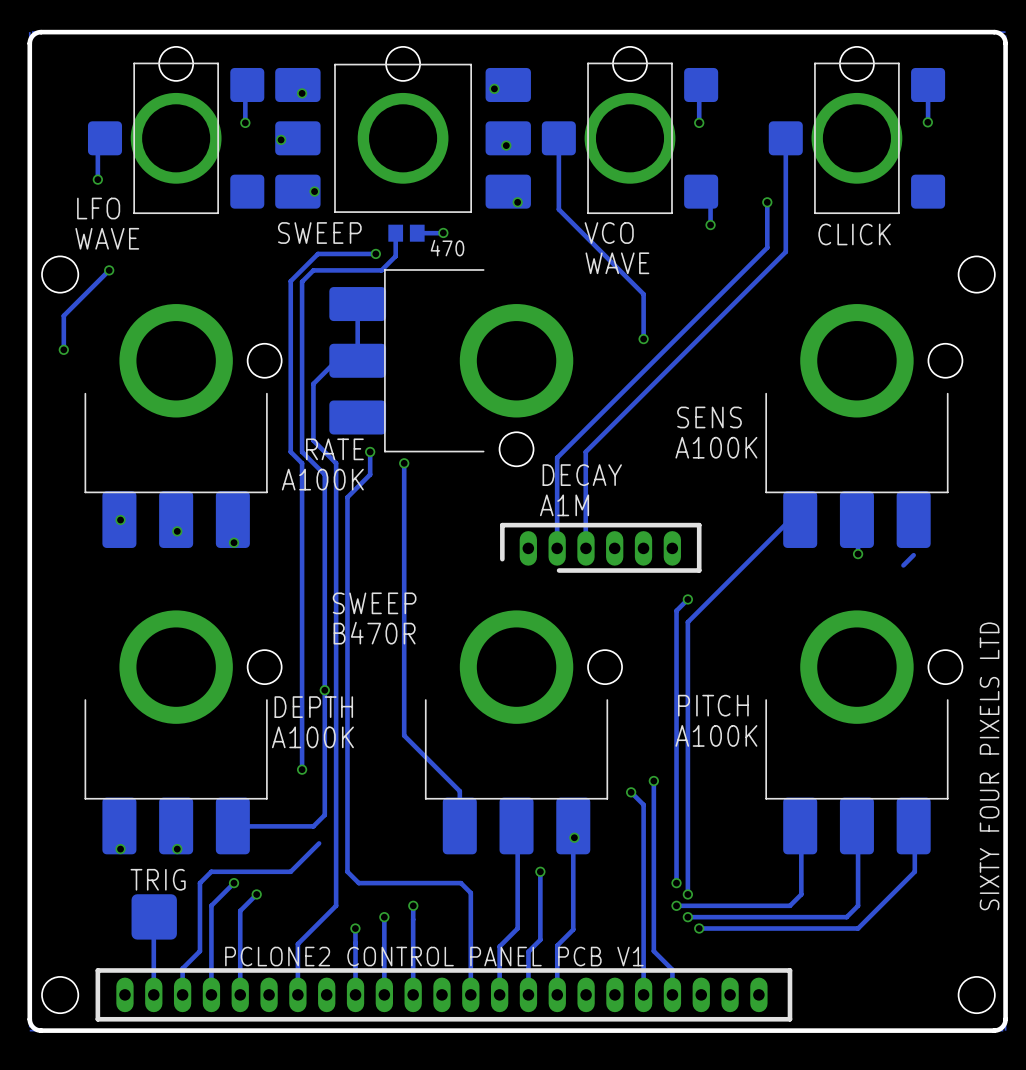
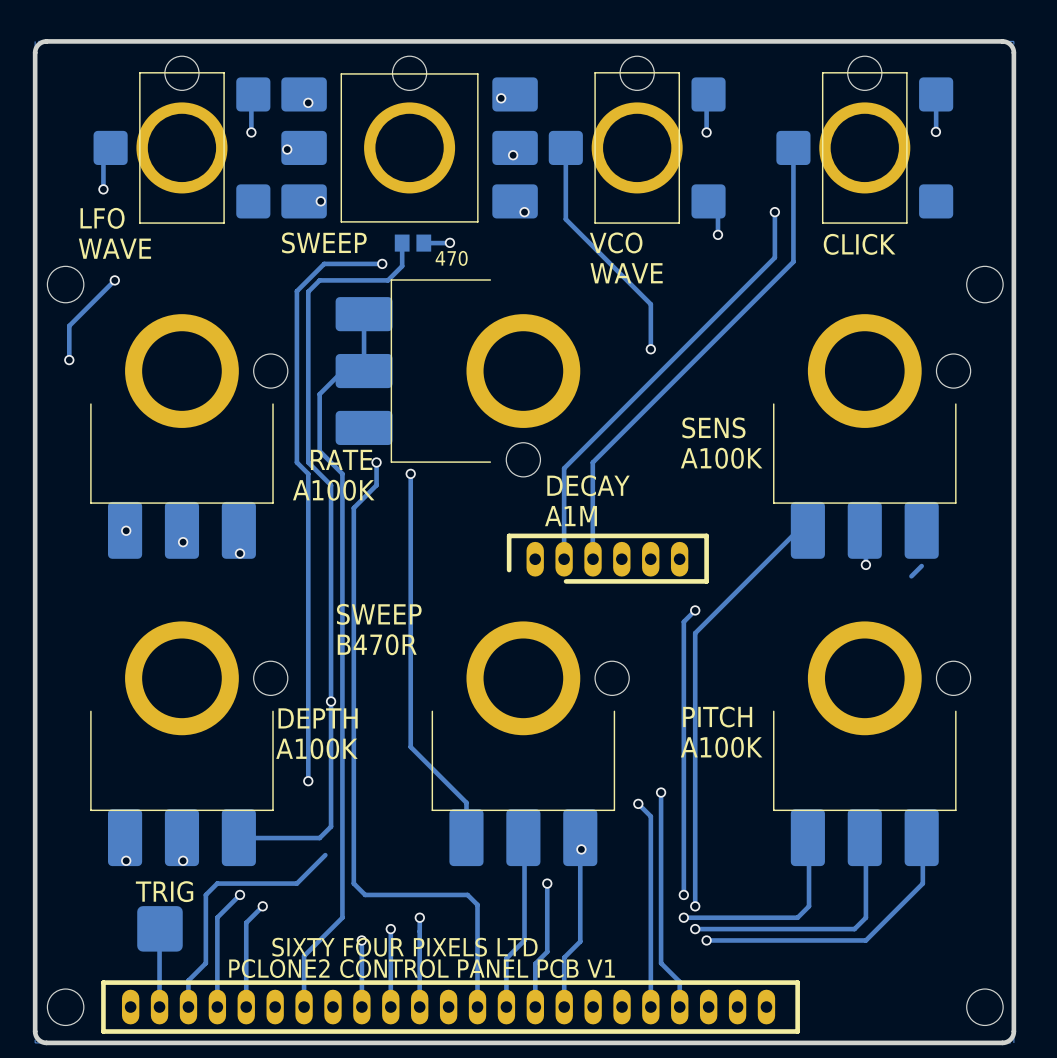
text: SIXTY FOUR PIXELS LTD (989, 766) -> none
text: none -> SIXTY FOUR PIXELS LTD (404, 947)

